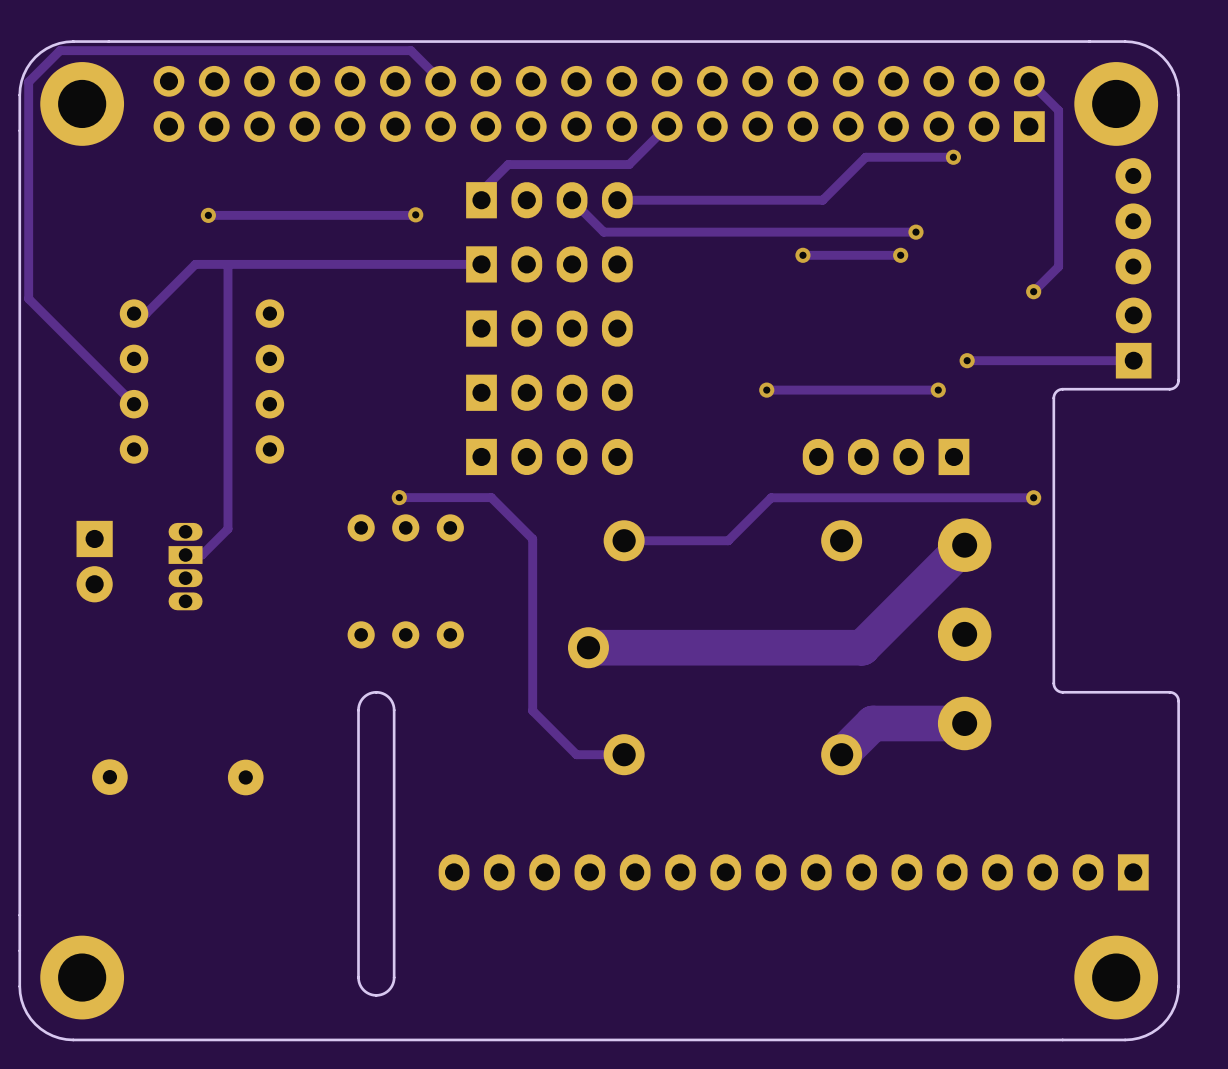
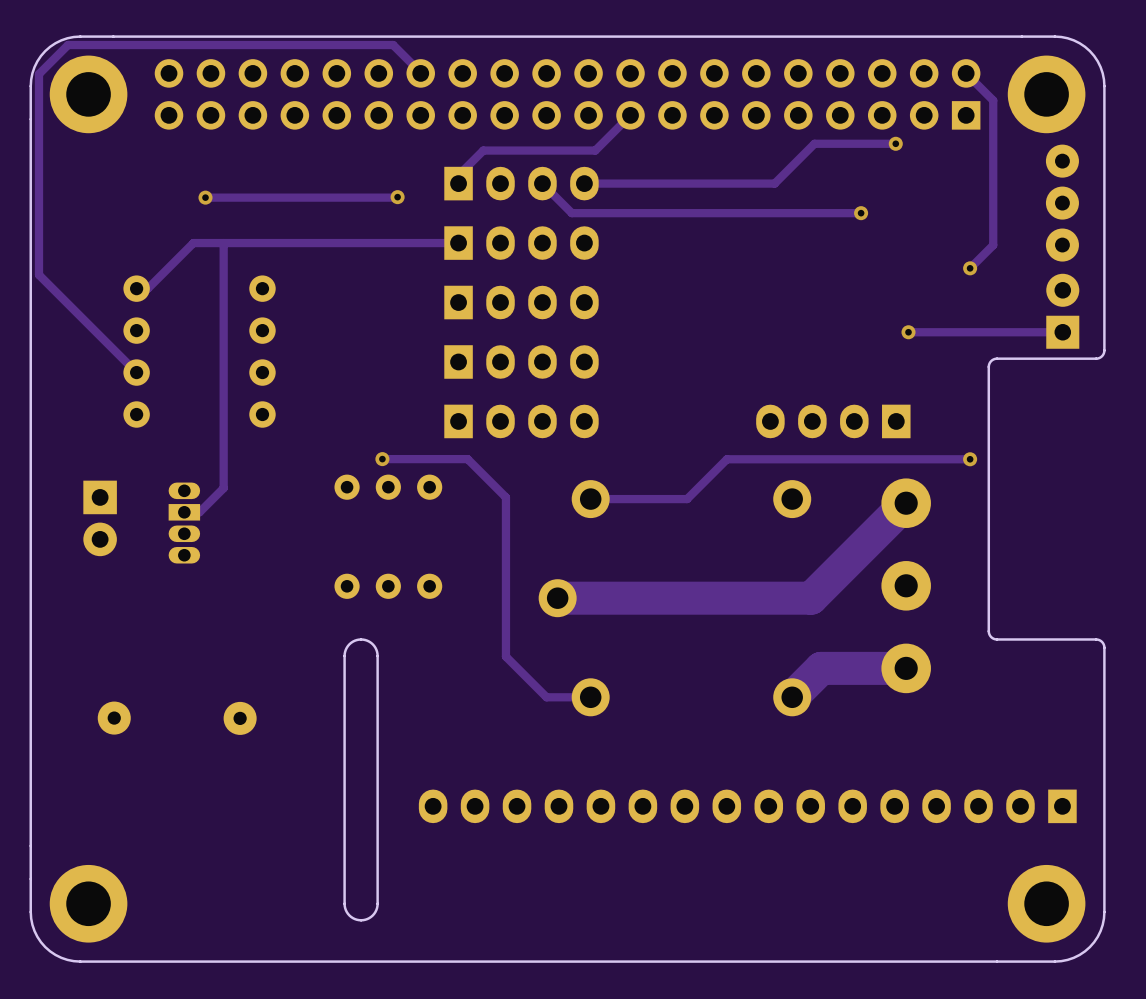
via: (802, 255) -> none
track: (900, 255) (802, 255) -> none
via: (900, 255) -> none
via: (766, 390) -> none
track: (938, 390) (766, 390) -> none
via: (938, 390) -> none

